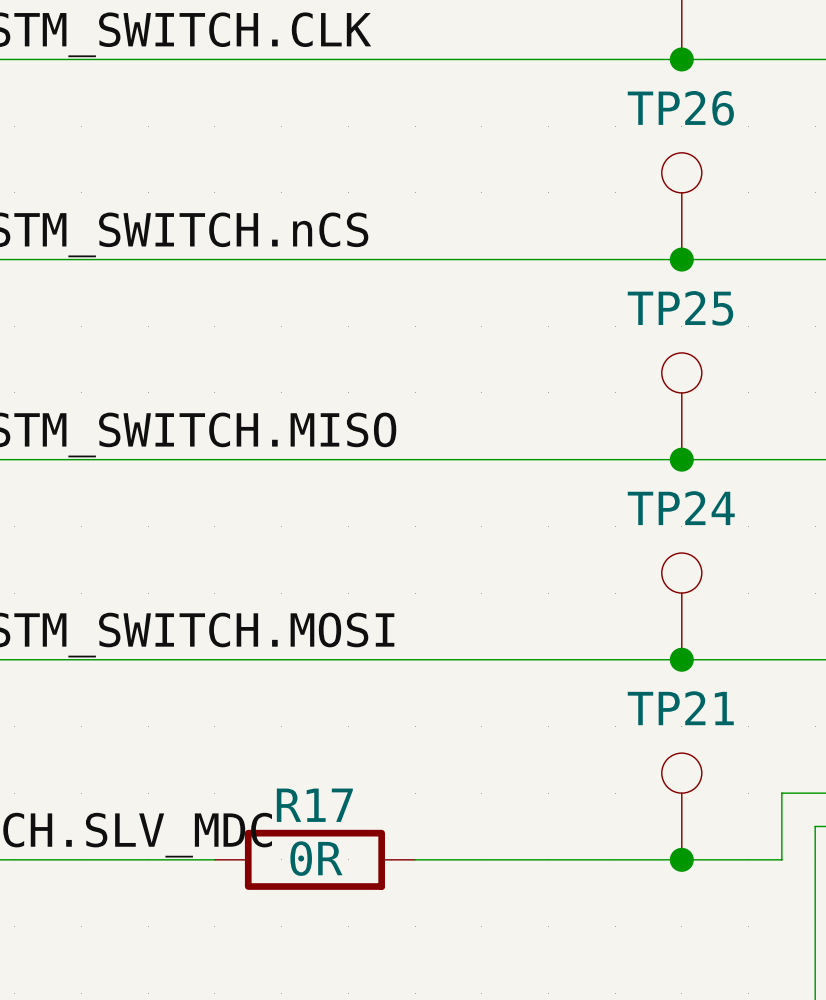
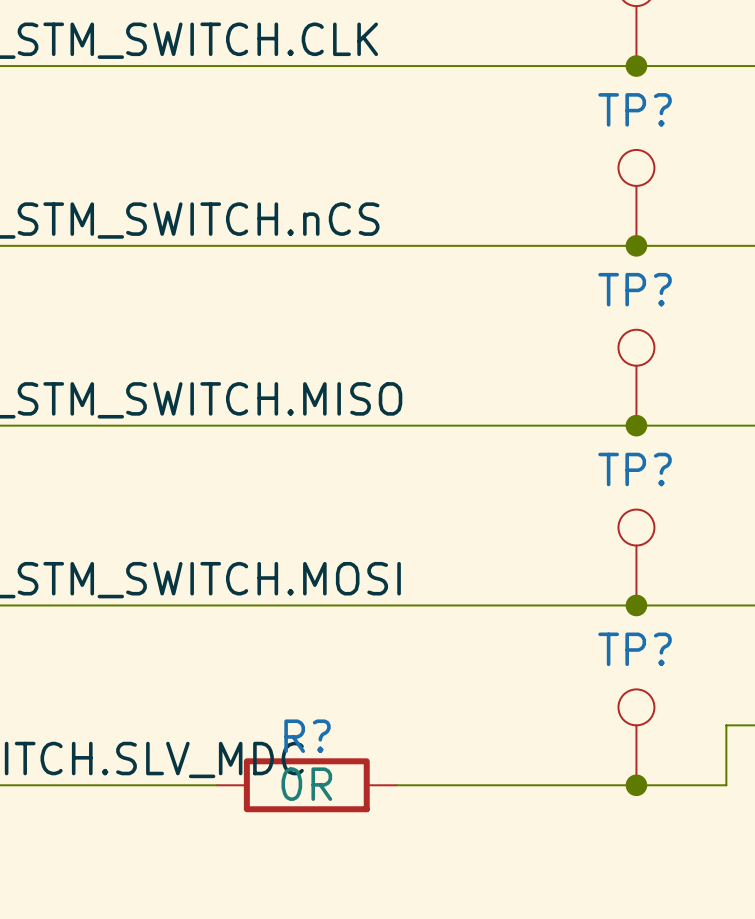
TP26 name: TP26 (680, 108) -> TP? (635, 109)
TP25 name: TP25 (680, 308) -> TP? (635, 289)
TP24 name: TP24 (681, 508) -> TP? (635, 469)
TP21 name: TP21 (680, 708) -> TP? (635, 649)
R17 name: R17 (314, 805) -> R? (307, 736)

